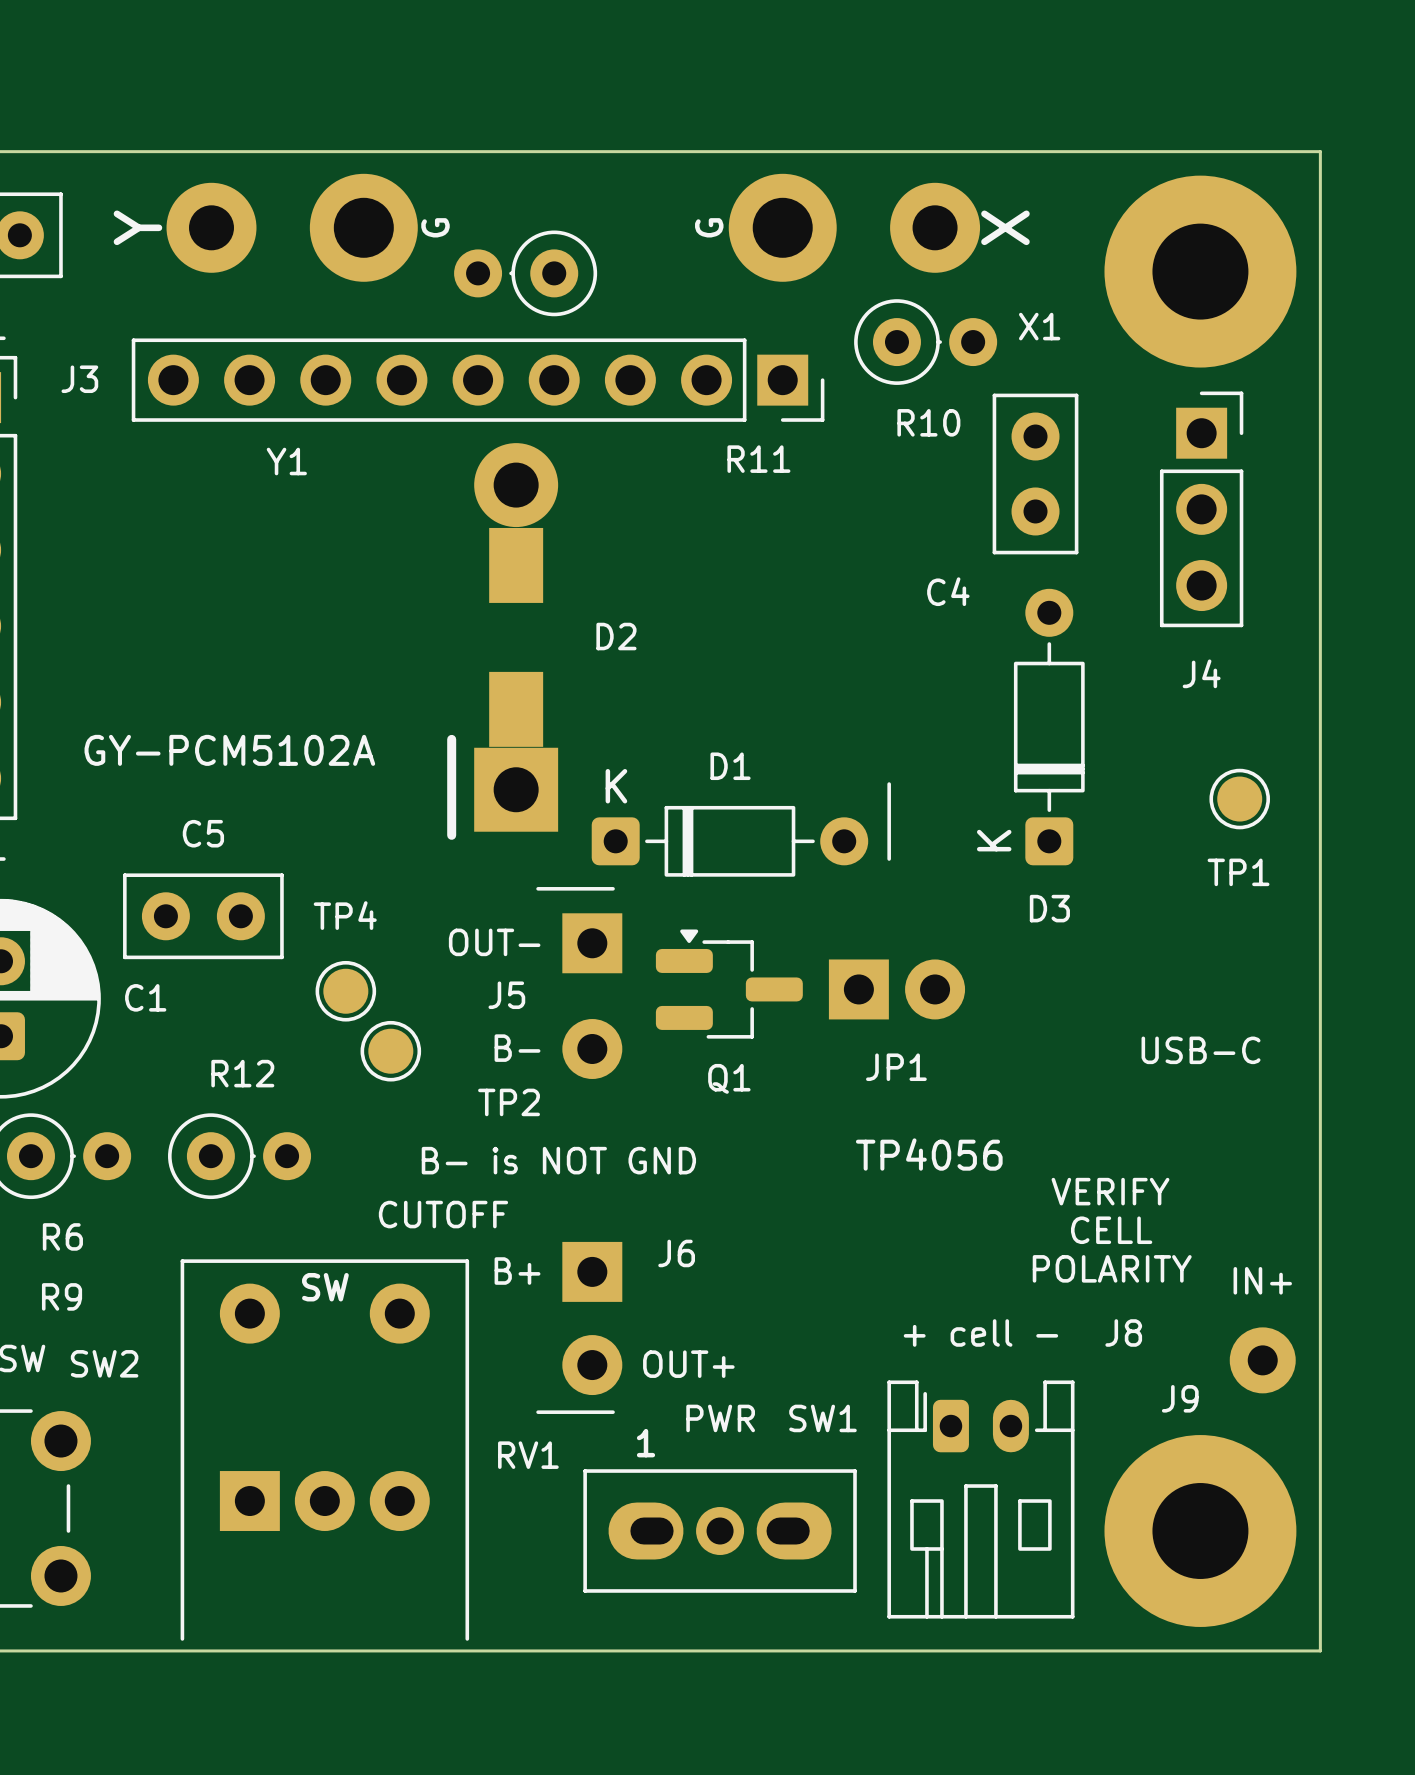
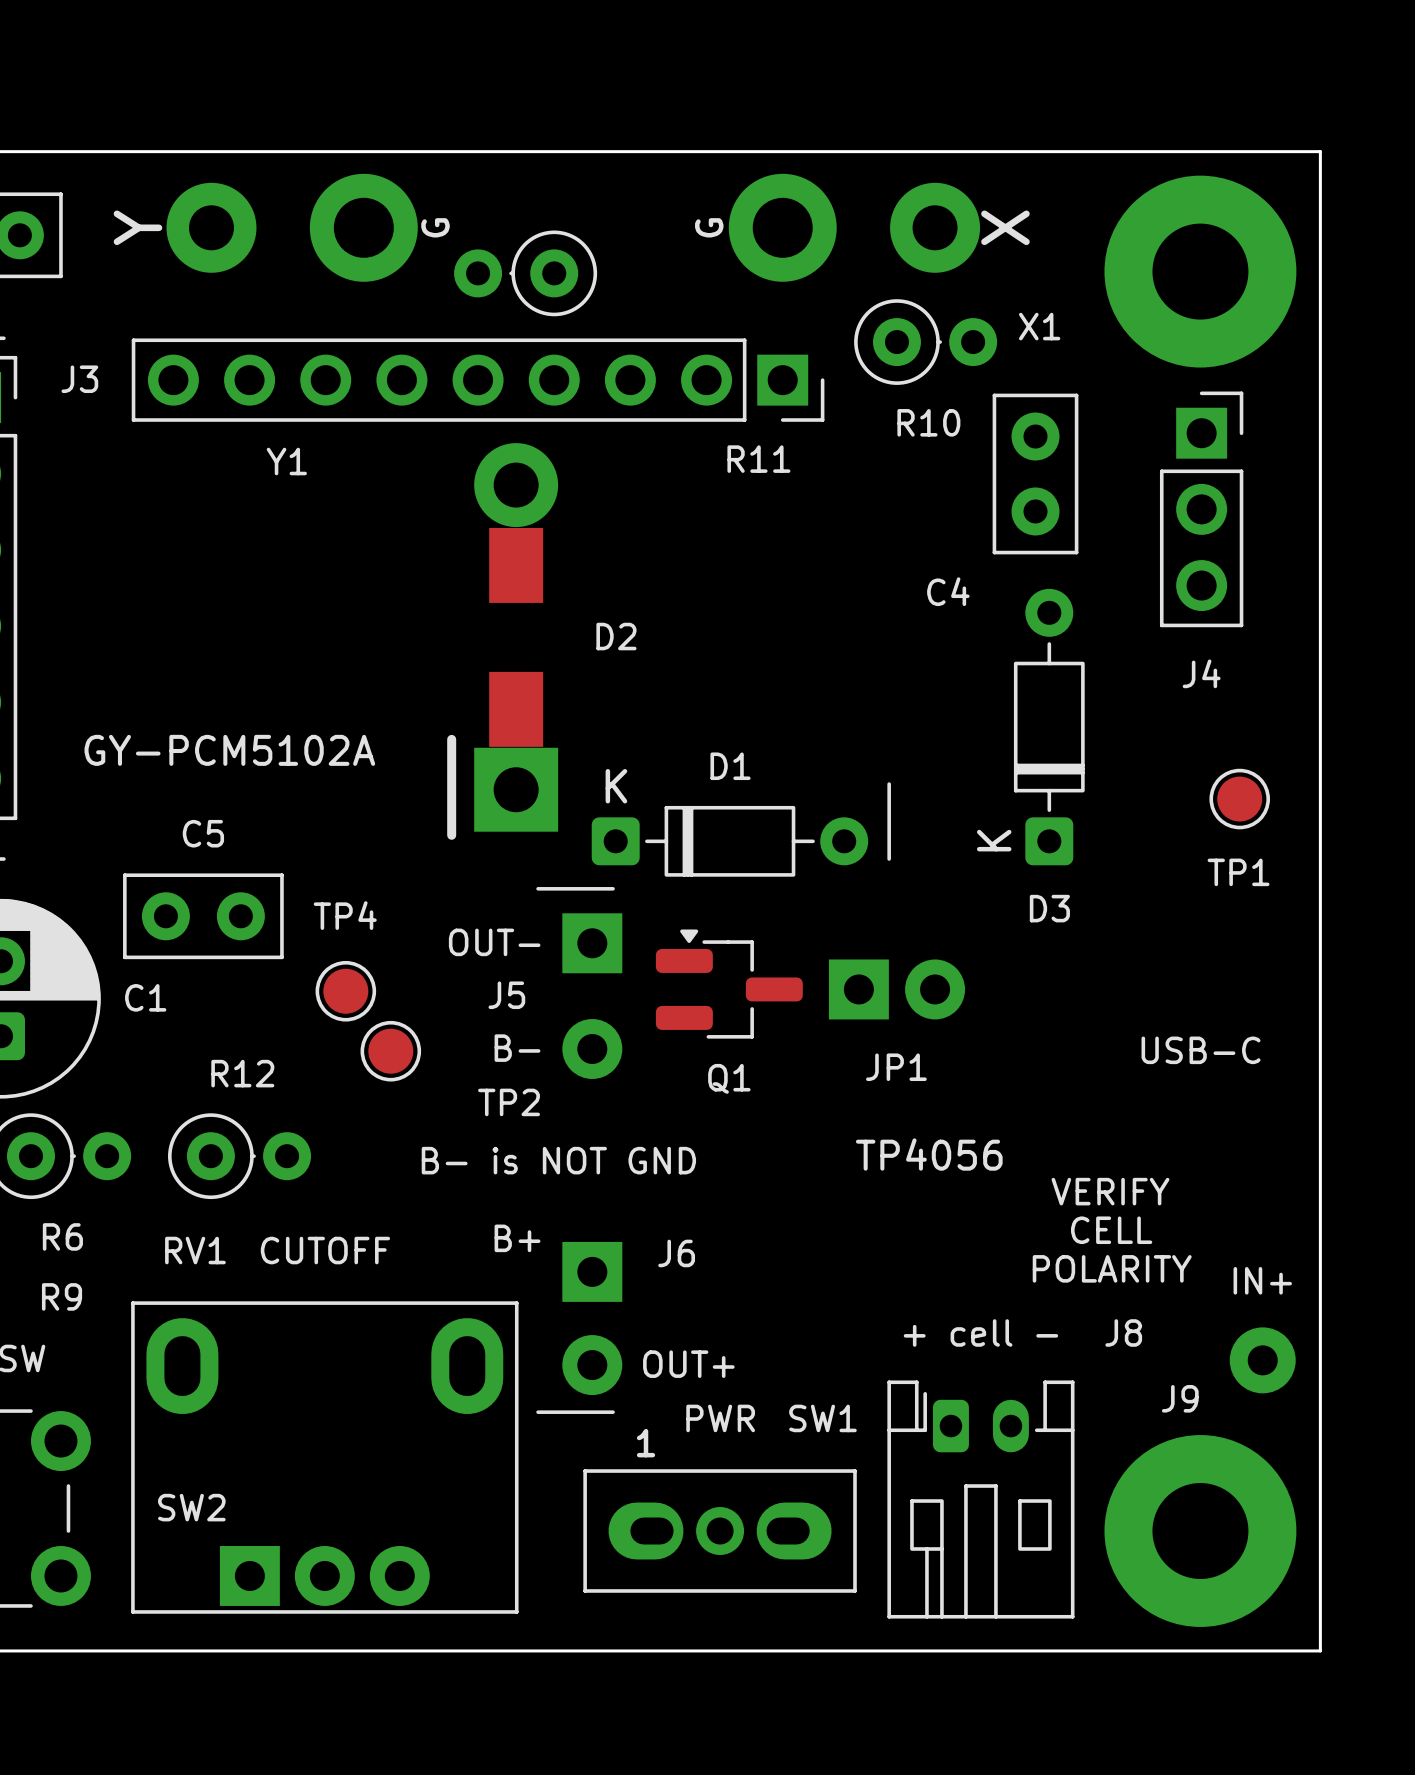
text position: CUTOFF (443, 1214) -> CUTOFF (325, 1250)
RV1 footprint: [180, 1259, 470, 1641] -> [131, 1301, 519, 1614]
text position: B+ (517, 1271) -> B+ (517, 1238)
SW2 name position: SW2 (104, 1363) -> SW2 (191, 1507)
RV1 name position: RV1 (528, 1455) -> RV1 (195, 1250)

